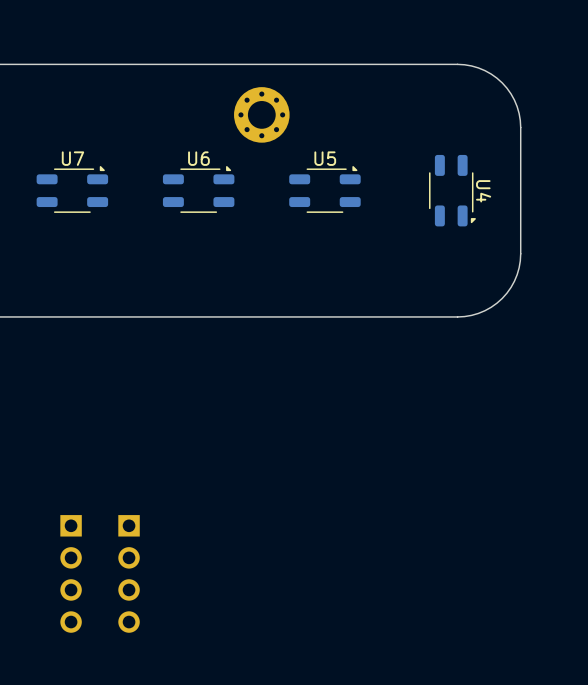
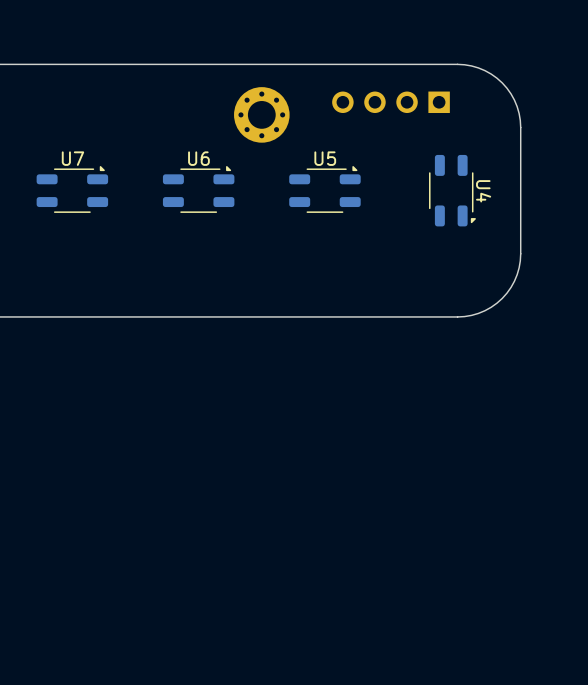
part: none -> (391, 102)
part: (71, 573) -> none
part: (129, 573) -> none

